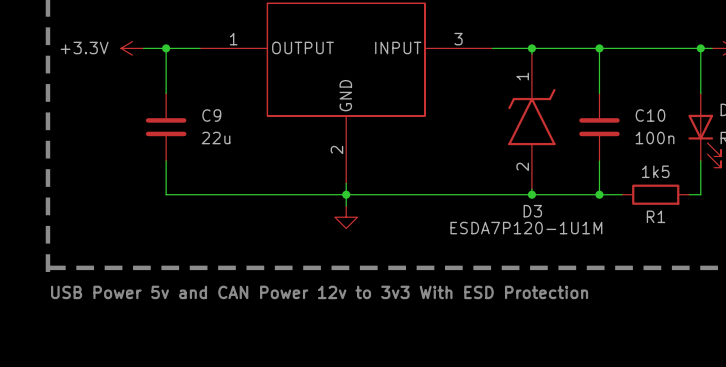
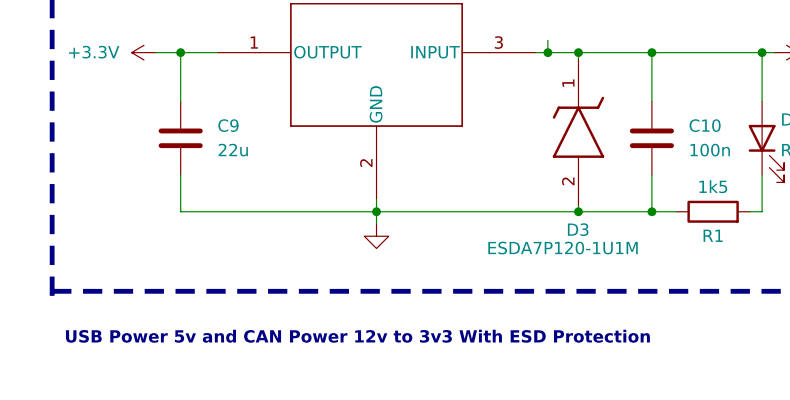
wire: none -> (547, 40) (547, 52)
junction: none -> (547, 52)
text position: USB Power 5v and CAN Power 12v to 3v3 With ESD Protection (319, 292) -> USB Power 5v and CAN Power 12v to 3v3 With ESD Protection (357, 336)

